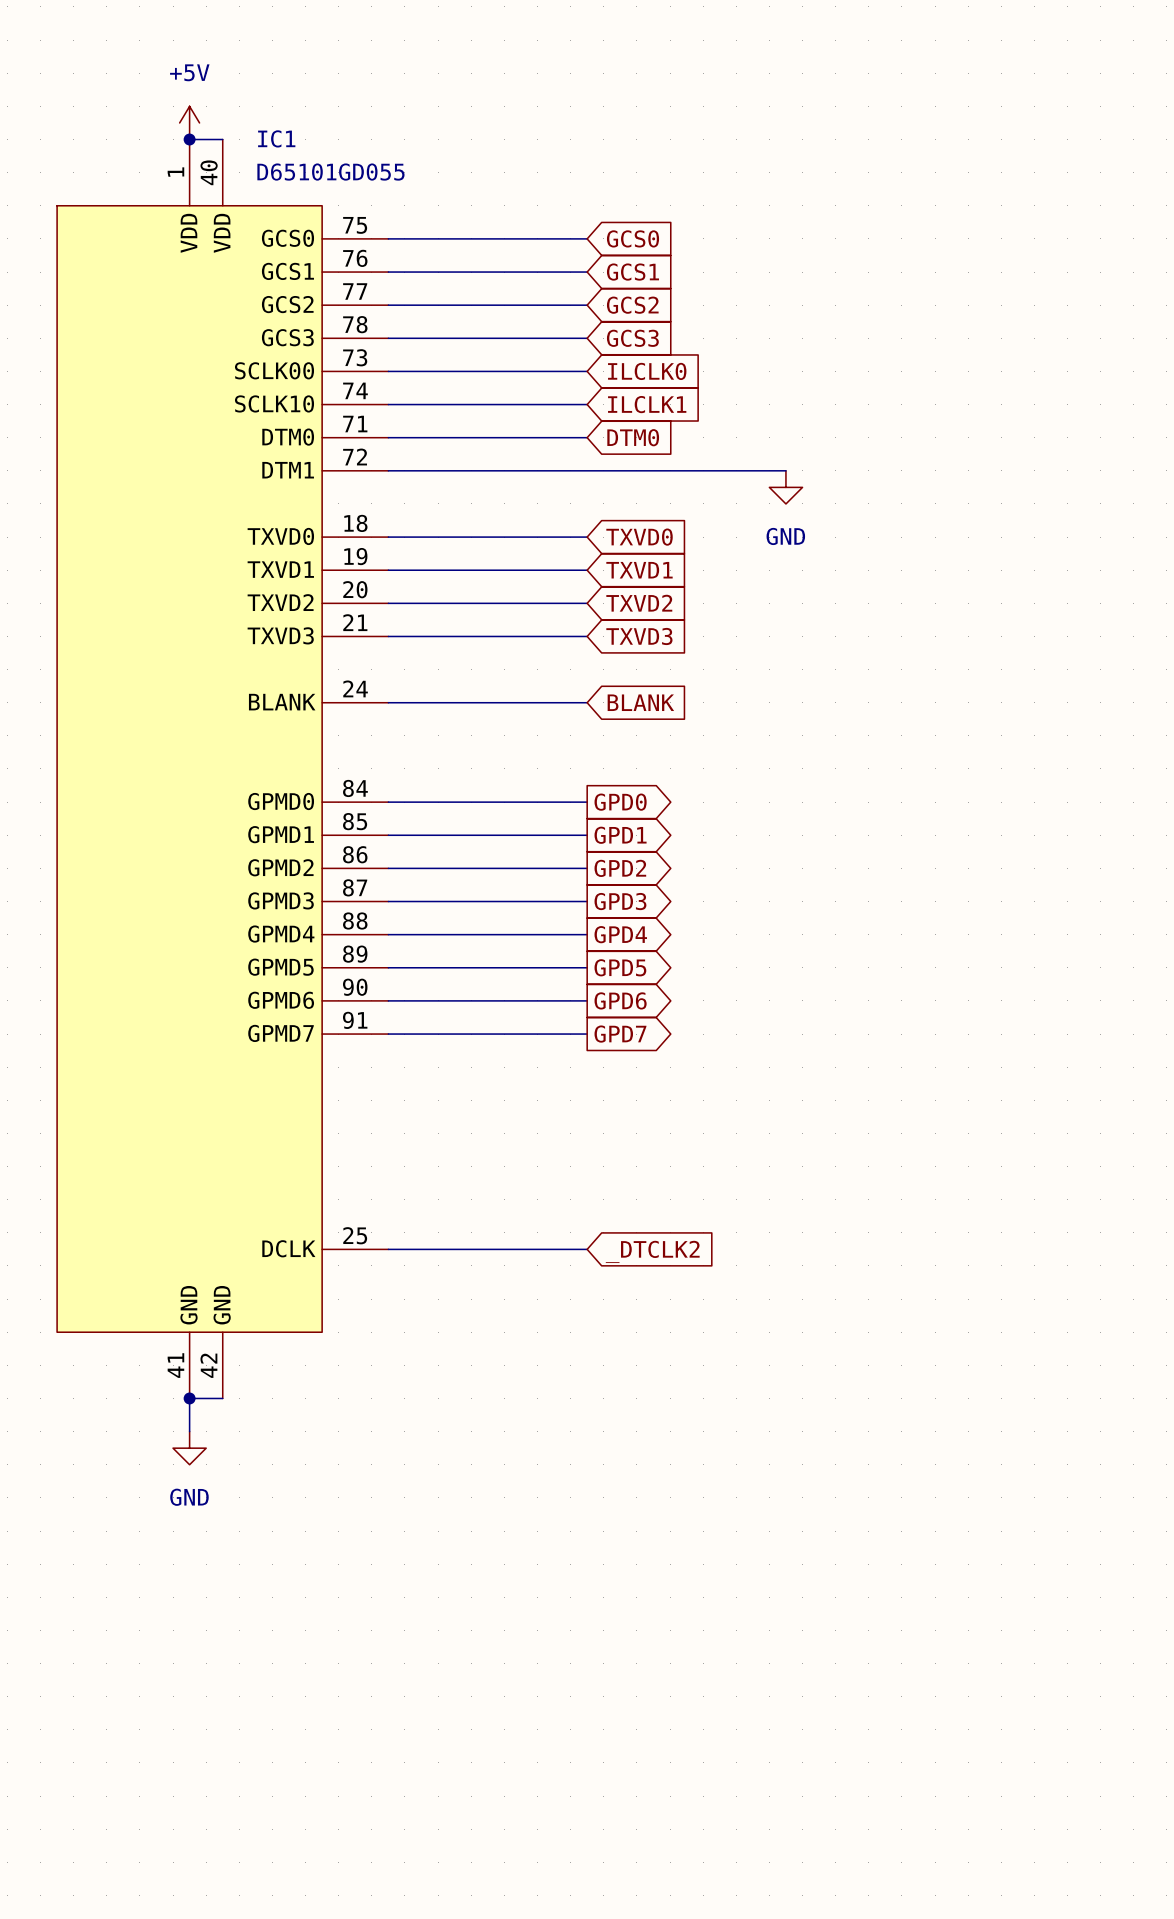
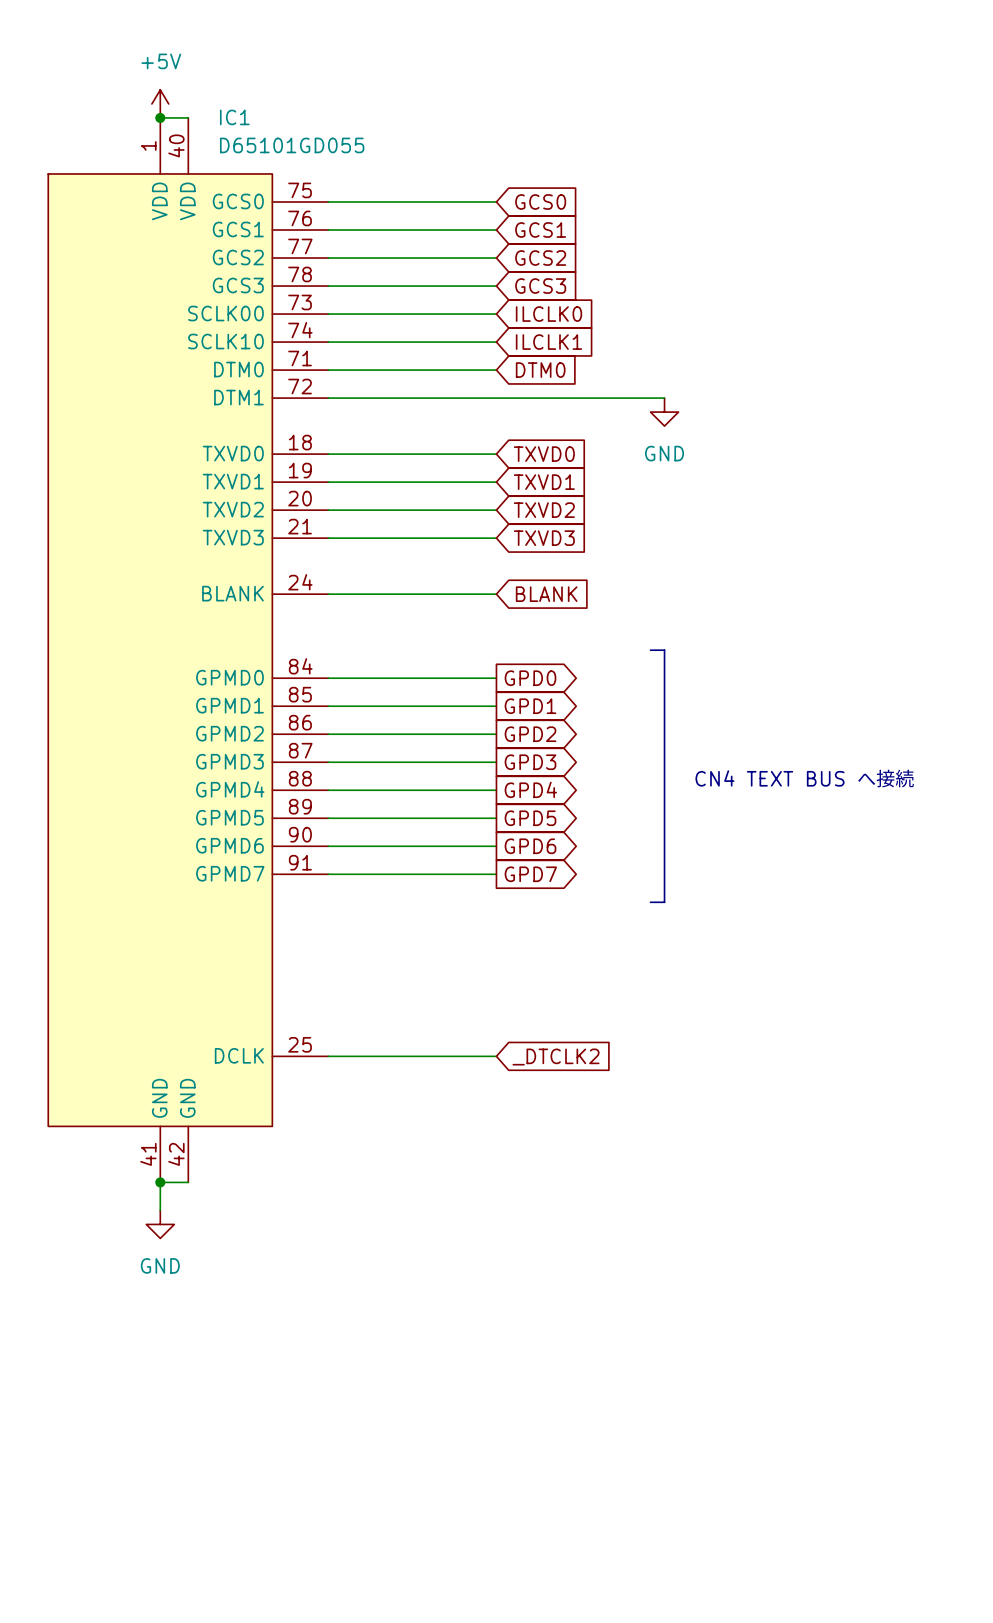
line: none -> (650, 650) (664, 650) (664, 902) (650, 902)
text: none -> CN4 TEXT BUS へ接続 (805, 778)

